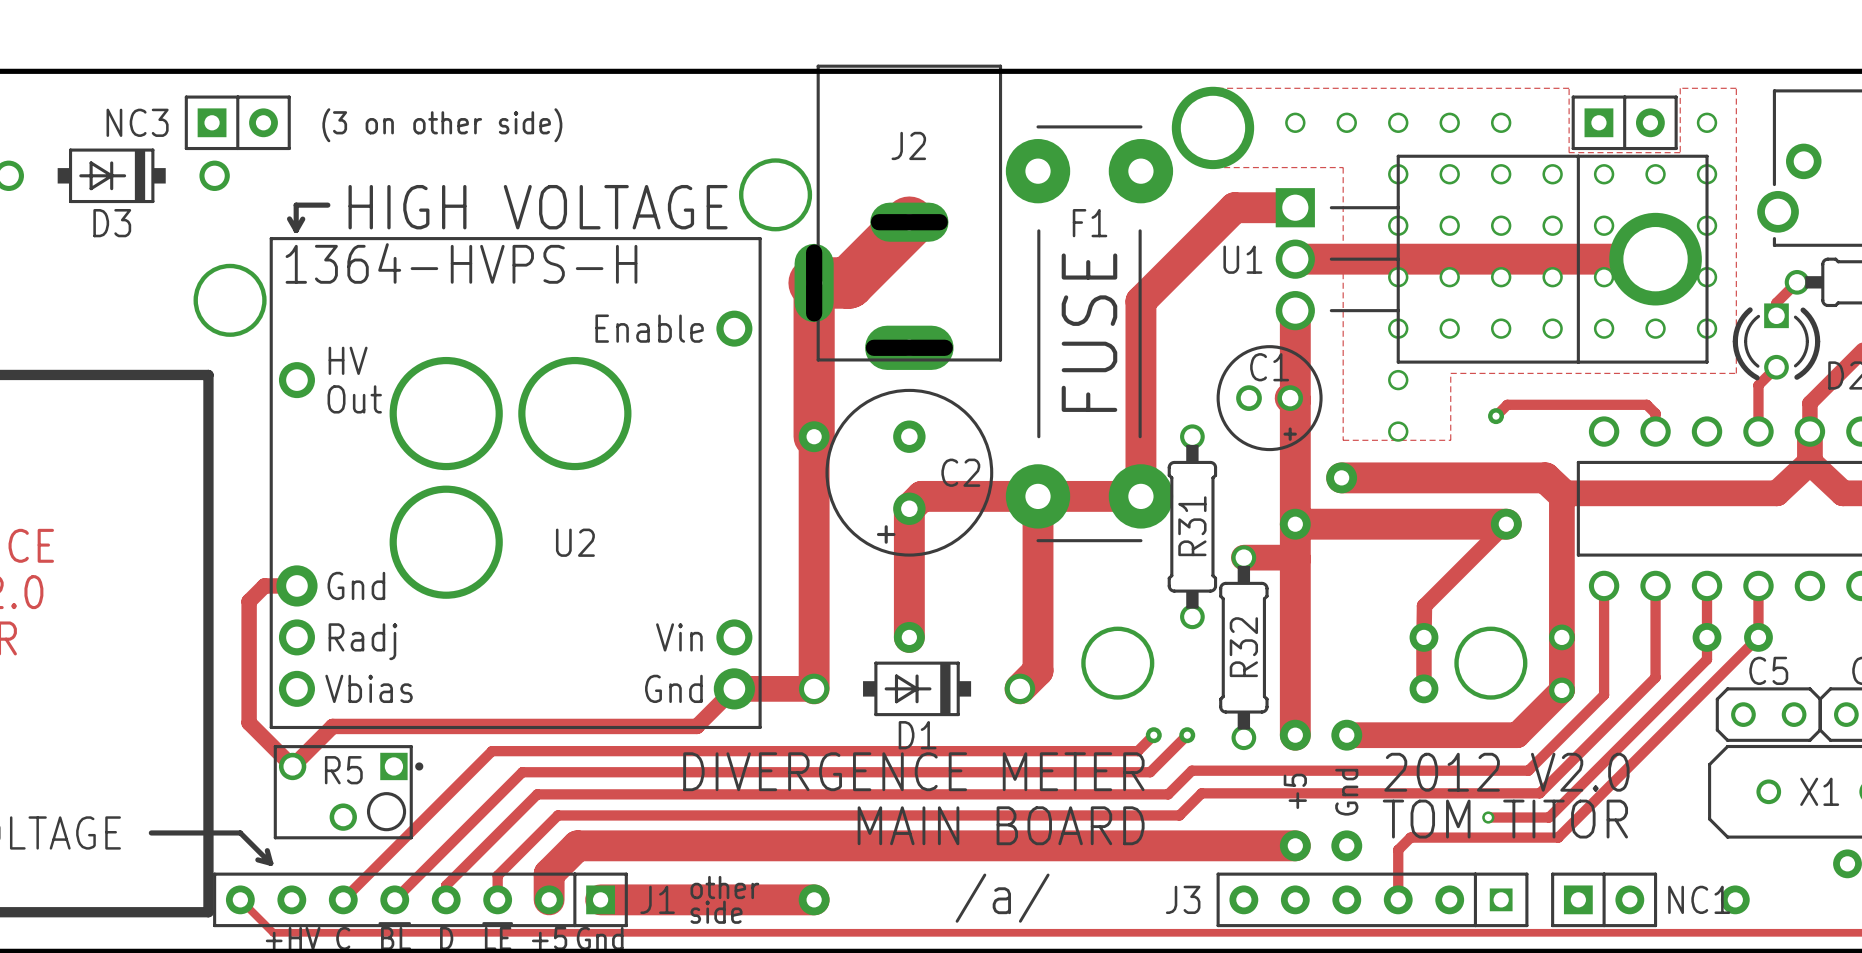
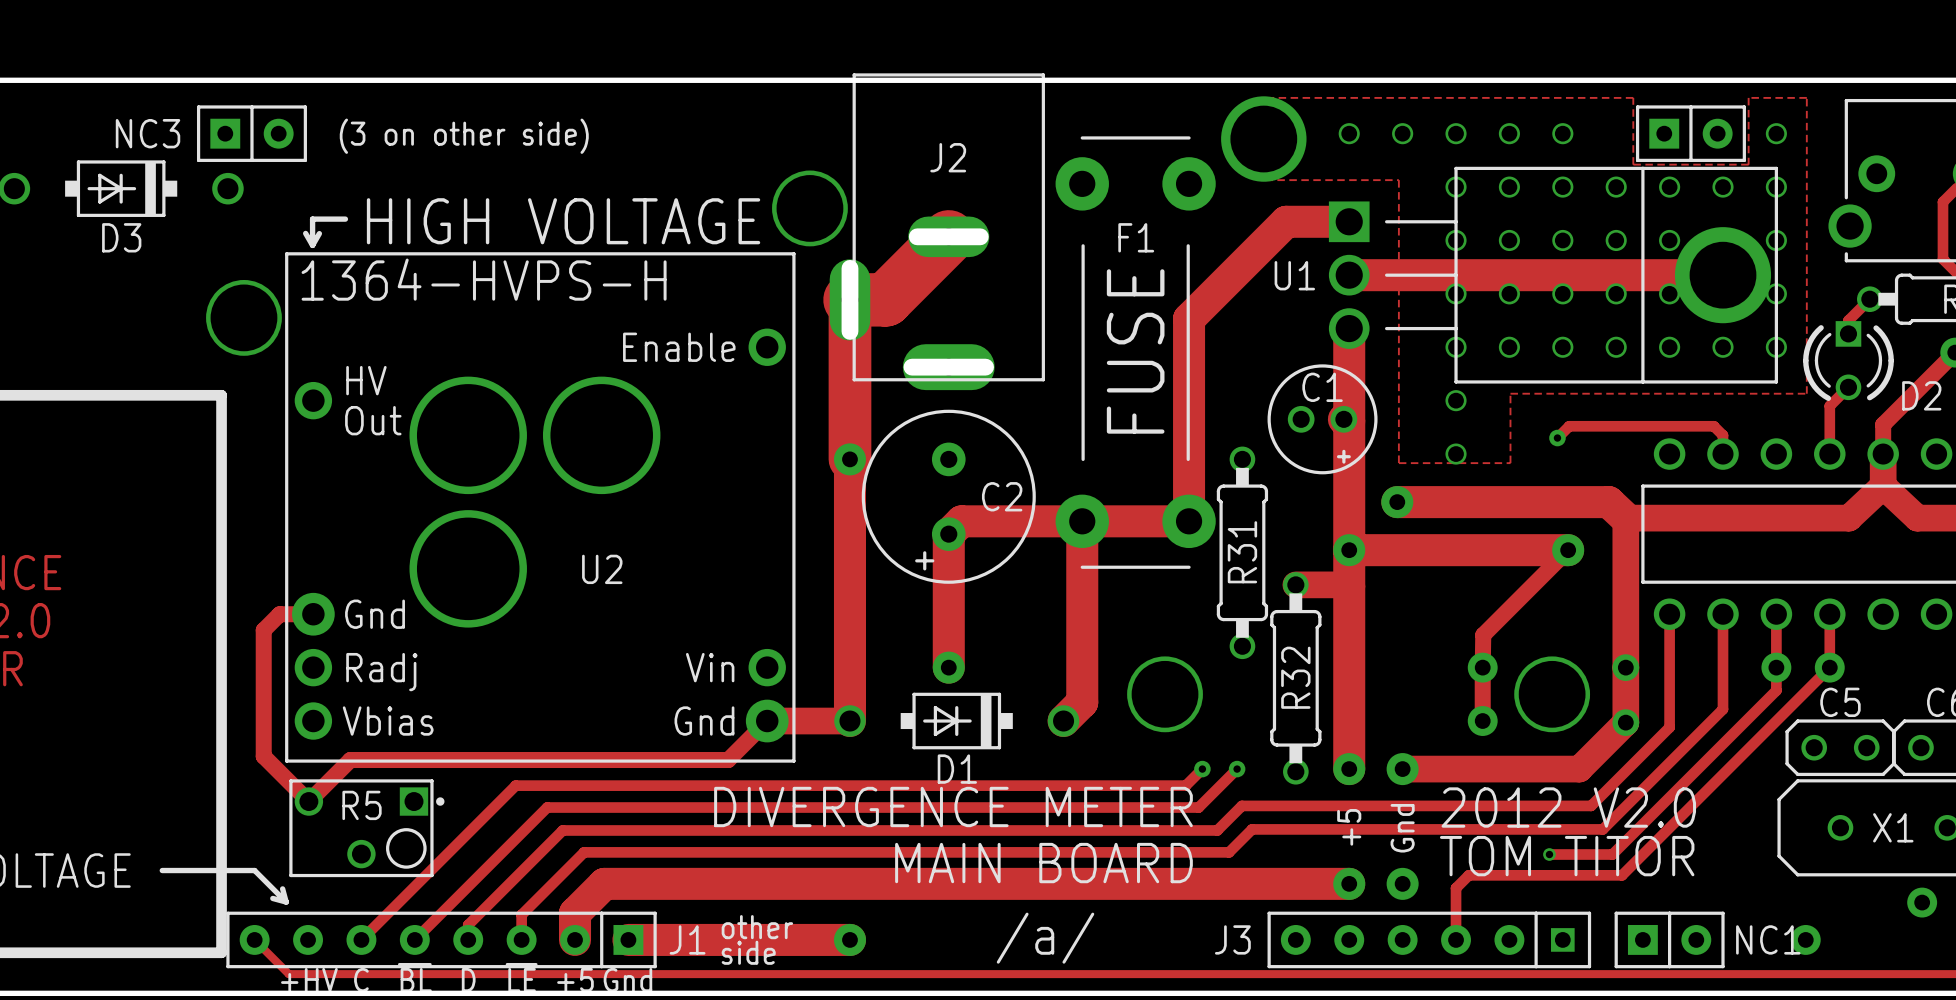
F1 footprint: [1005, 125, 1174, 543] -> [1055, 136, 1216, 569]

